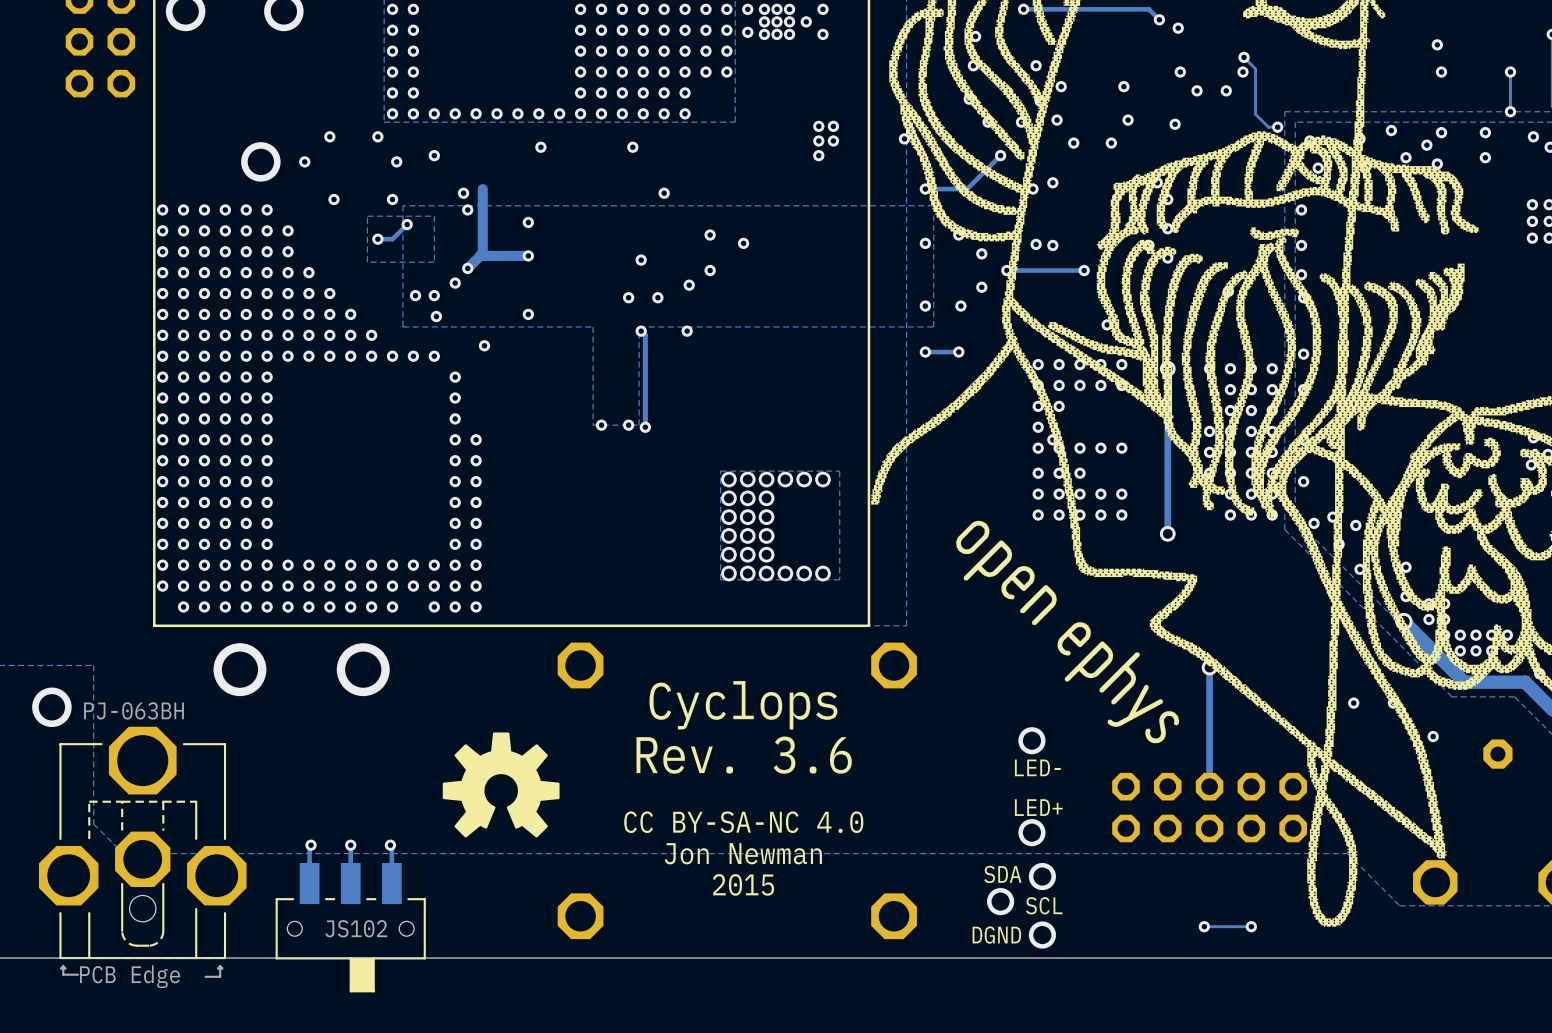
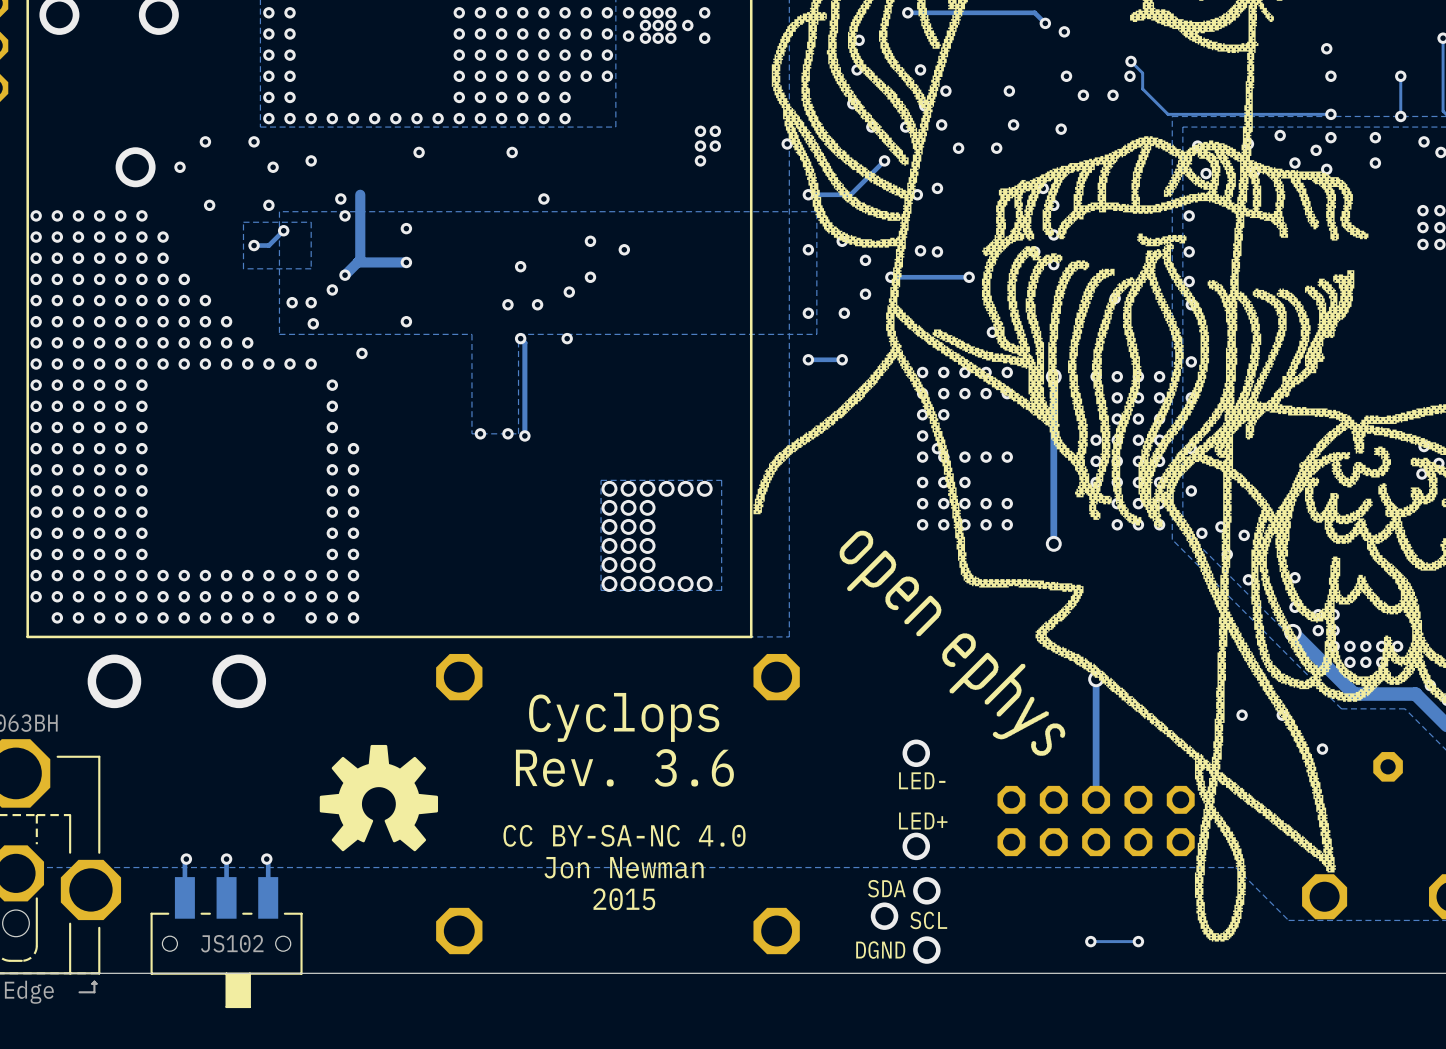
track: (1255, 84) (1255, 114) (1268, 127) (1277, 127) -> (1142, 88) (1168, 114) (1330, 114)
via: none -> (1330, 114)
via: (1277, 127) -> none

